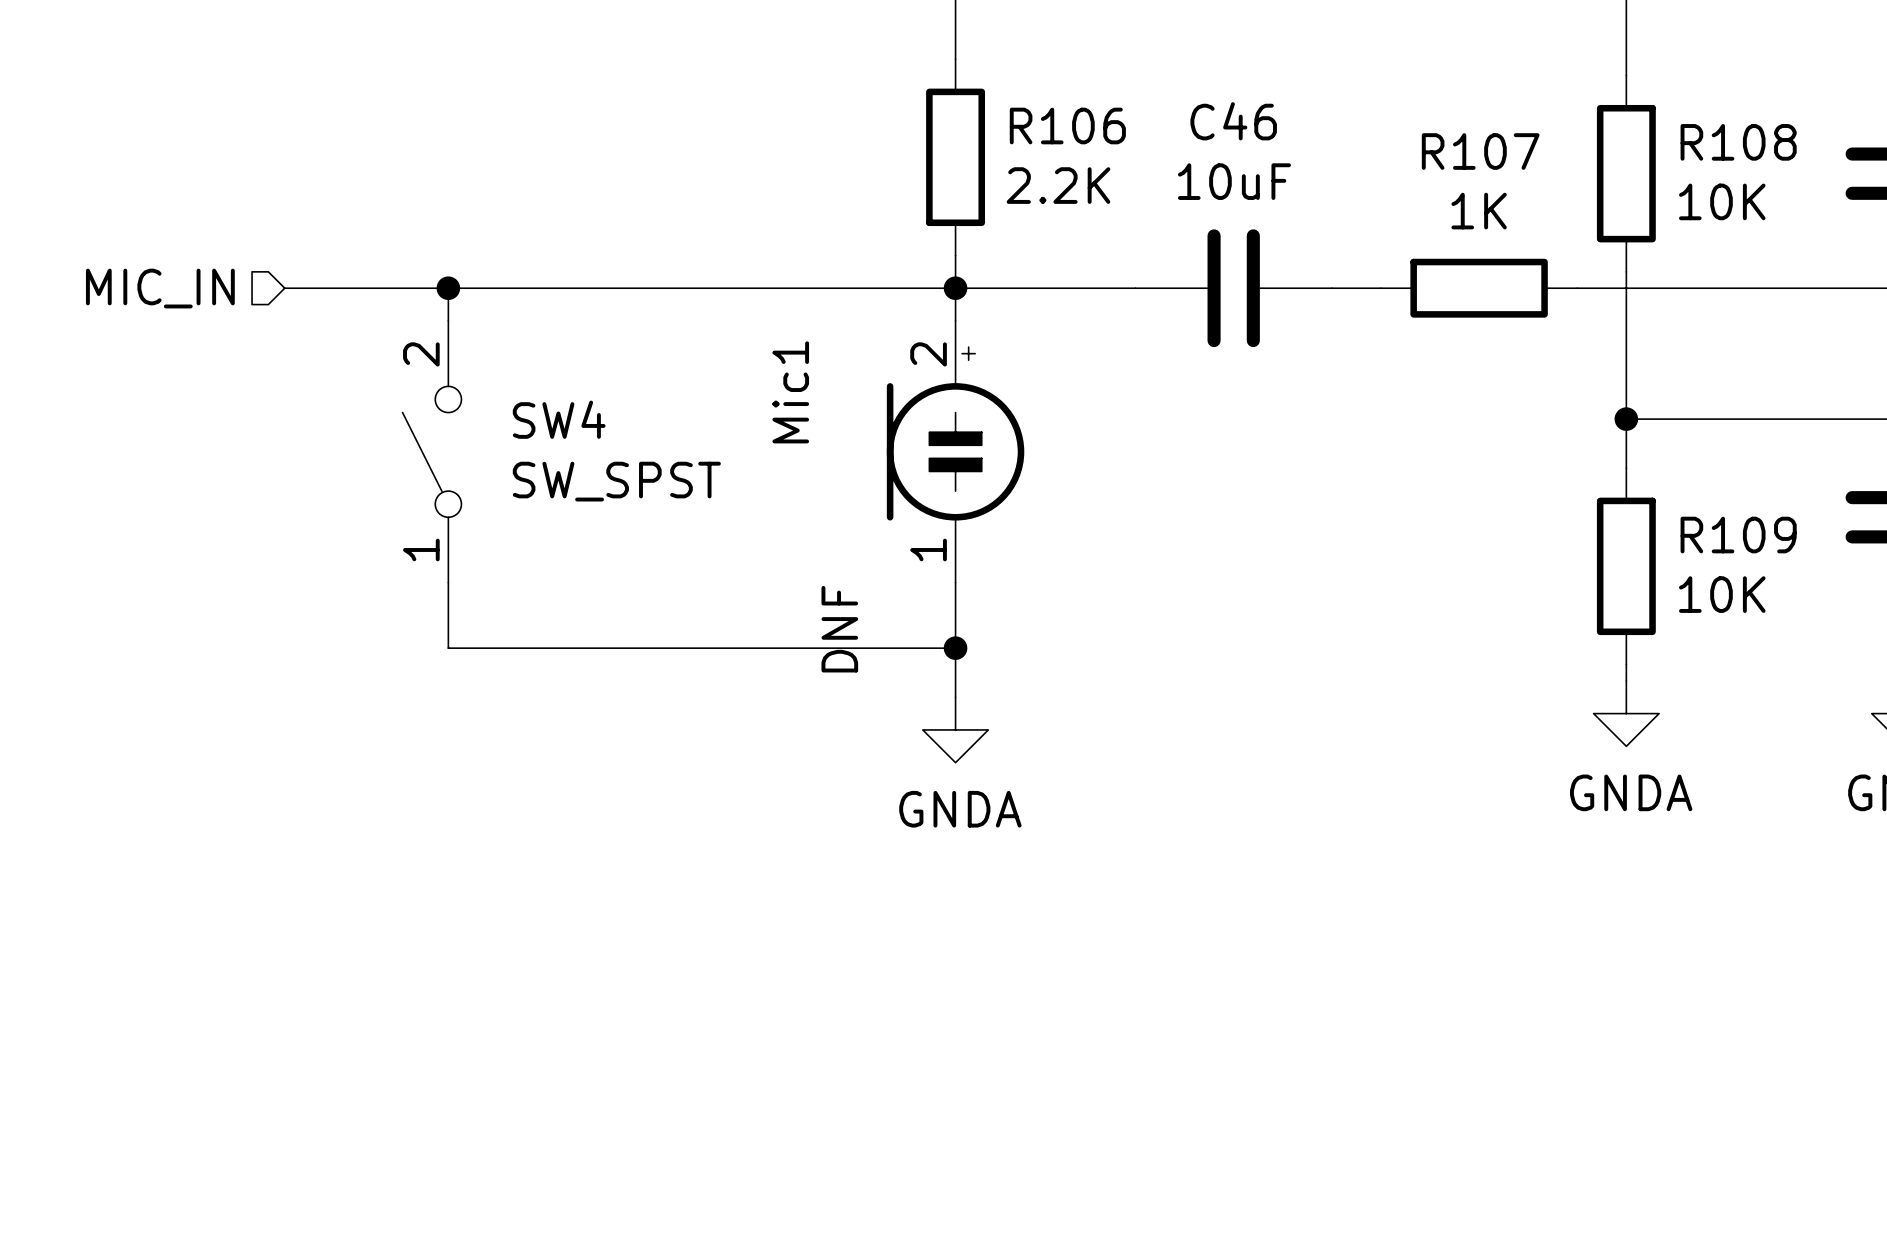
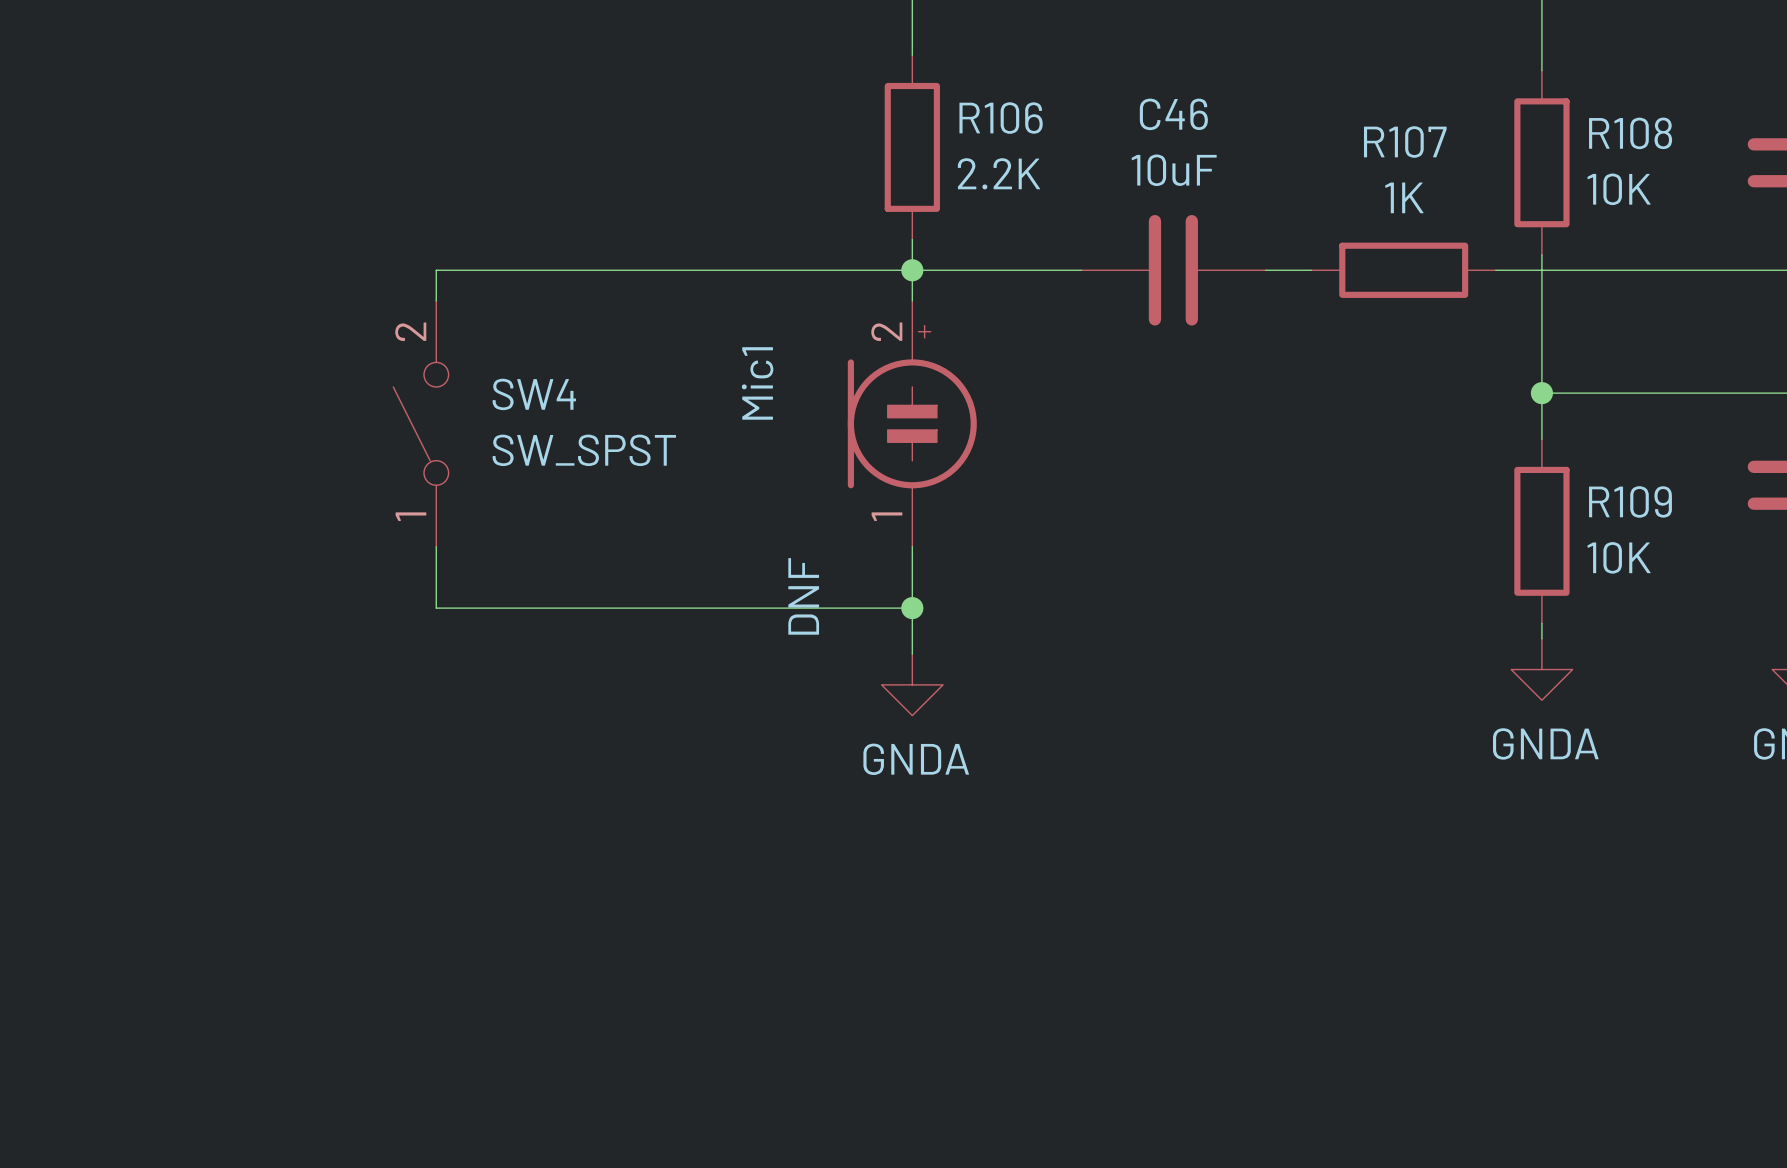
hierarchical label: MIC_IN (160, 288) -> none
wire: (284, 288) (448, 288) -> none
junction: (448, 288) -> none

